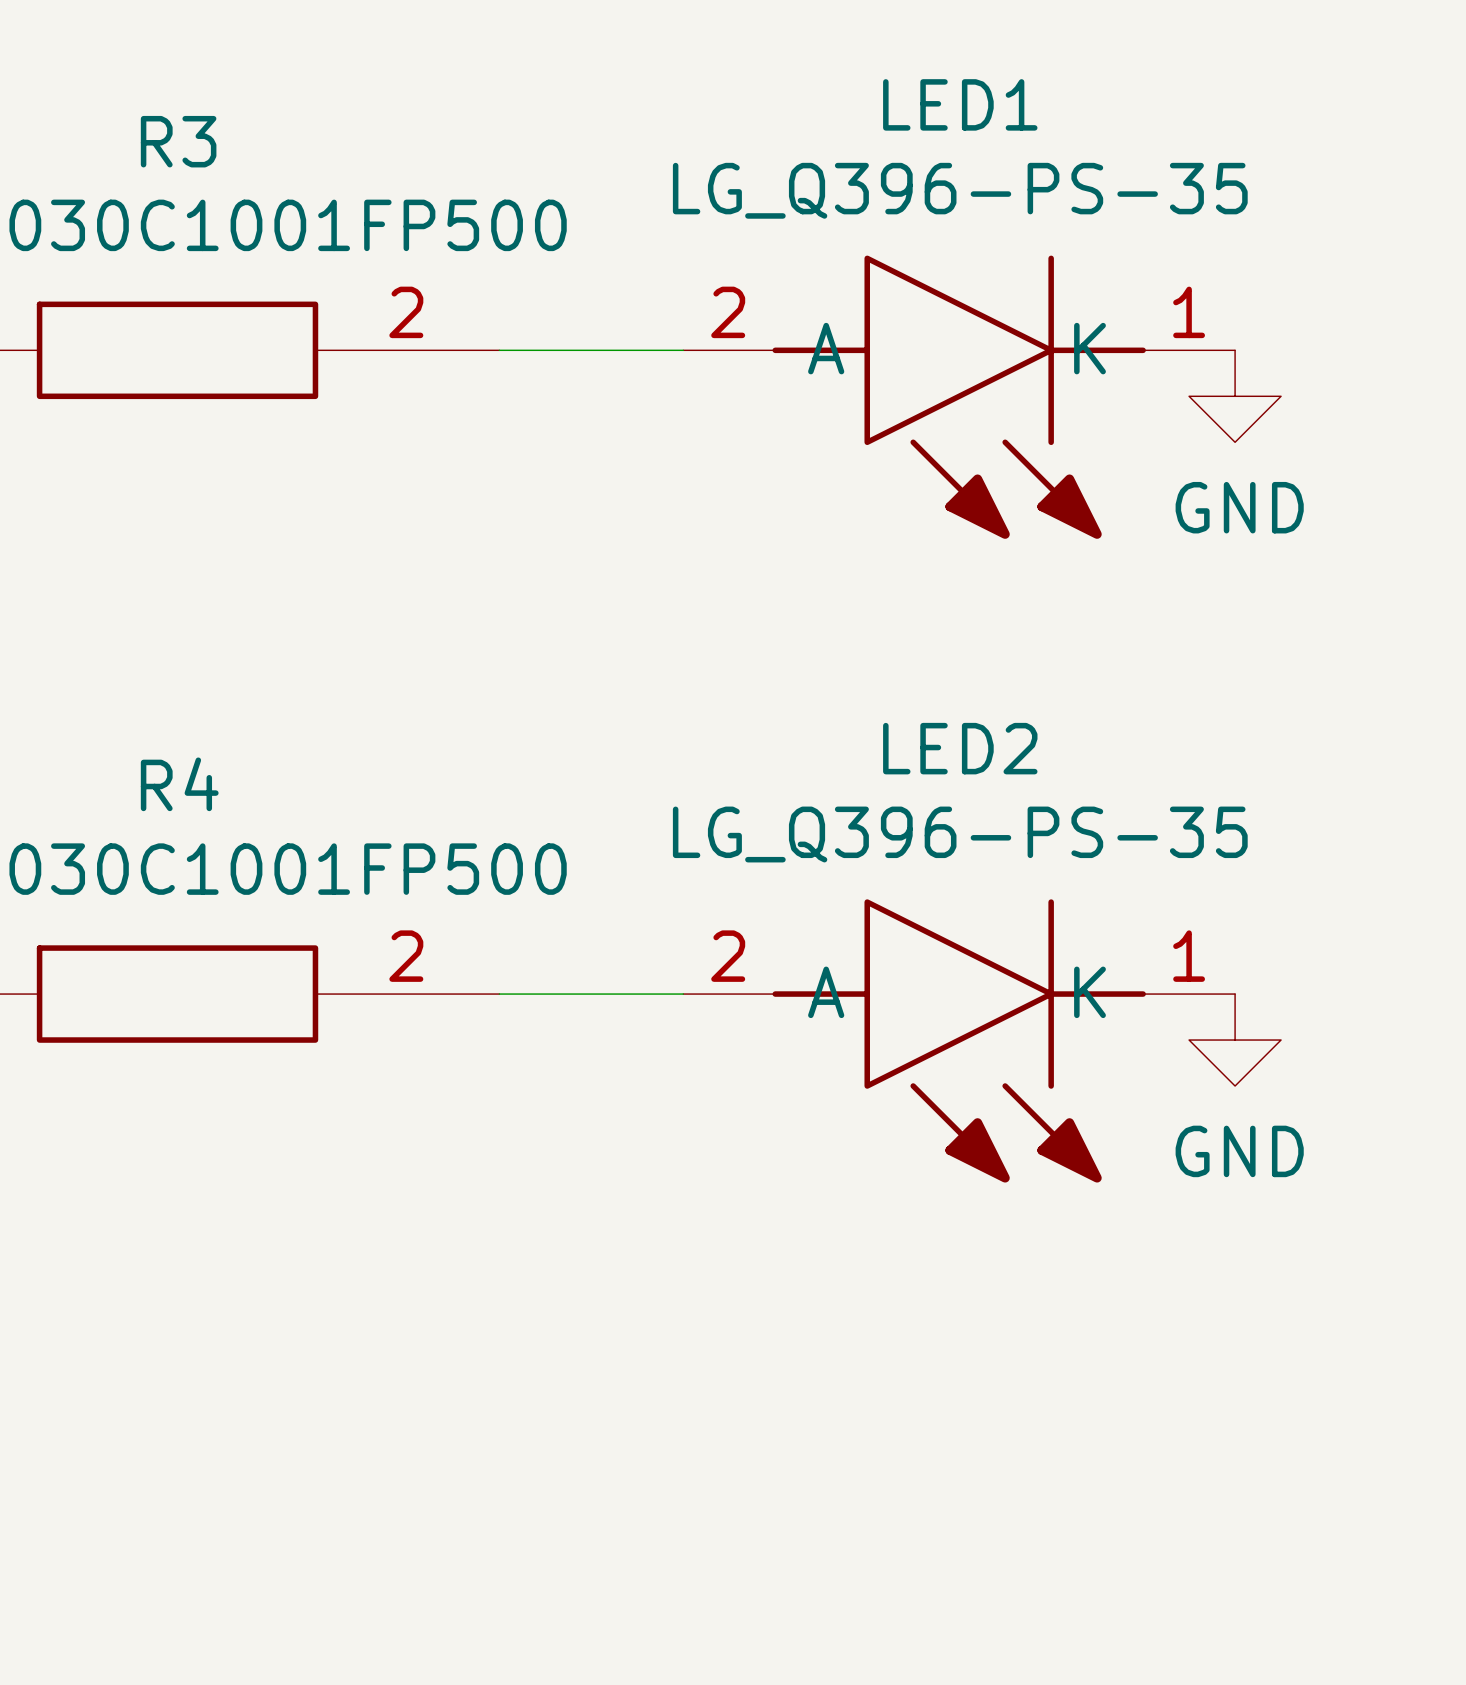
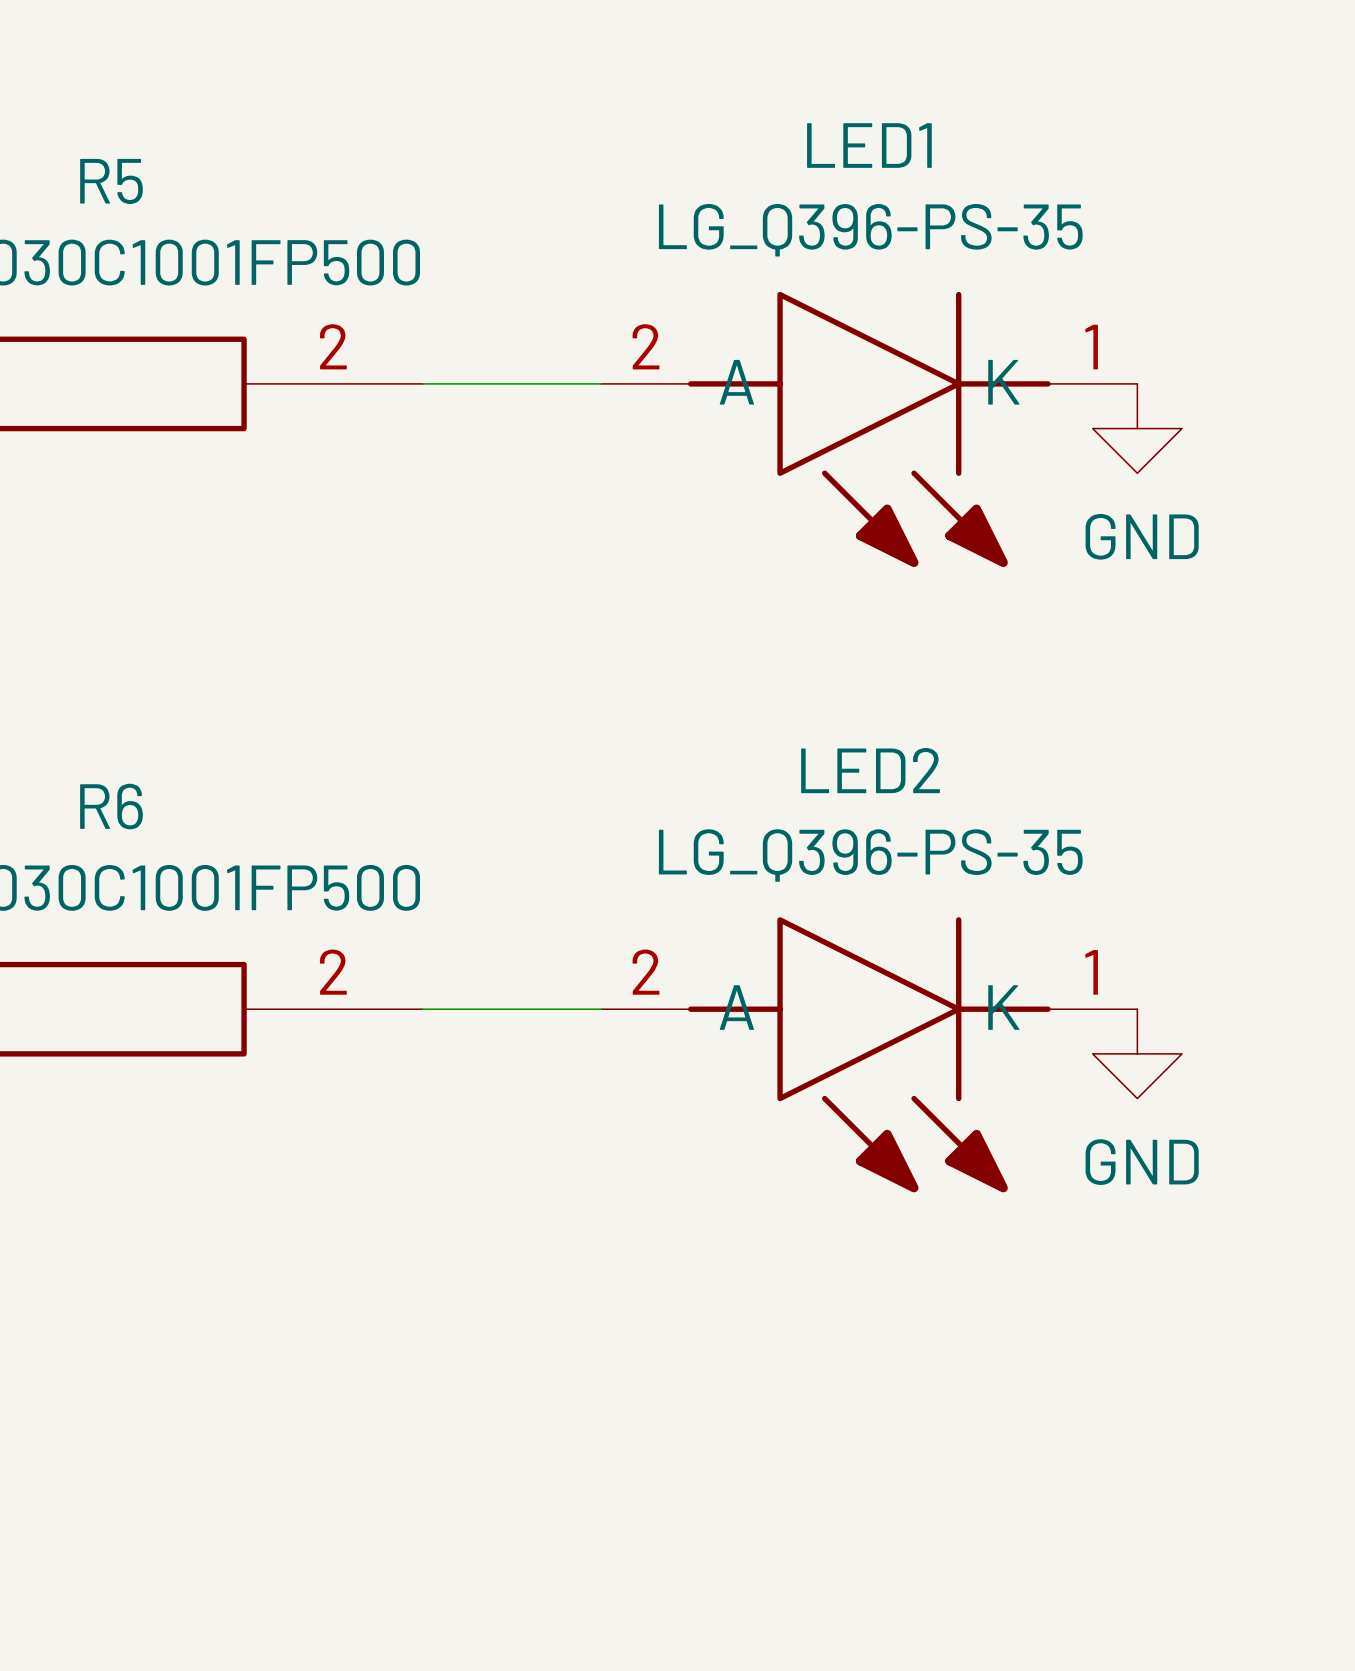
R3 name: R3 (178, 141) -> R5 (111, 181)
R4 name: R4 (179, 784) -> R6 (111, 806)

